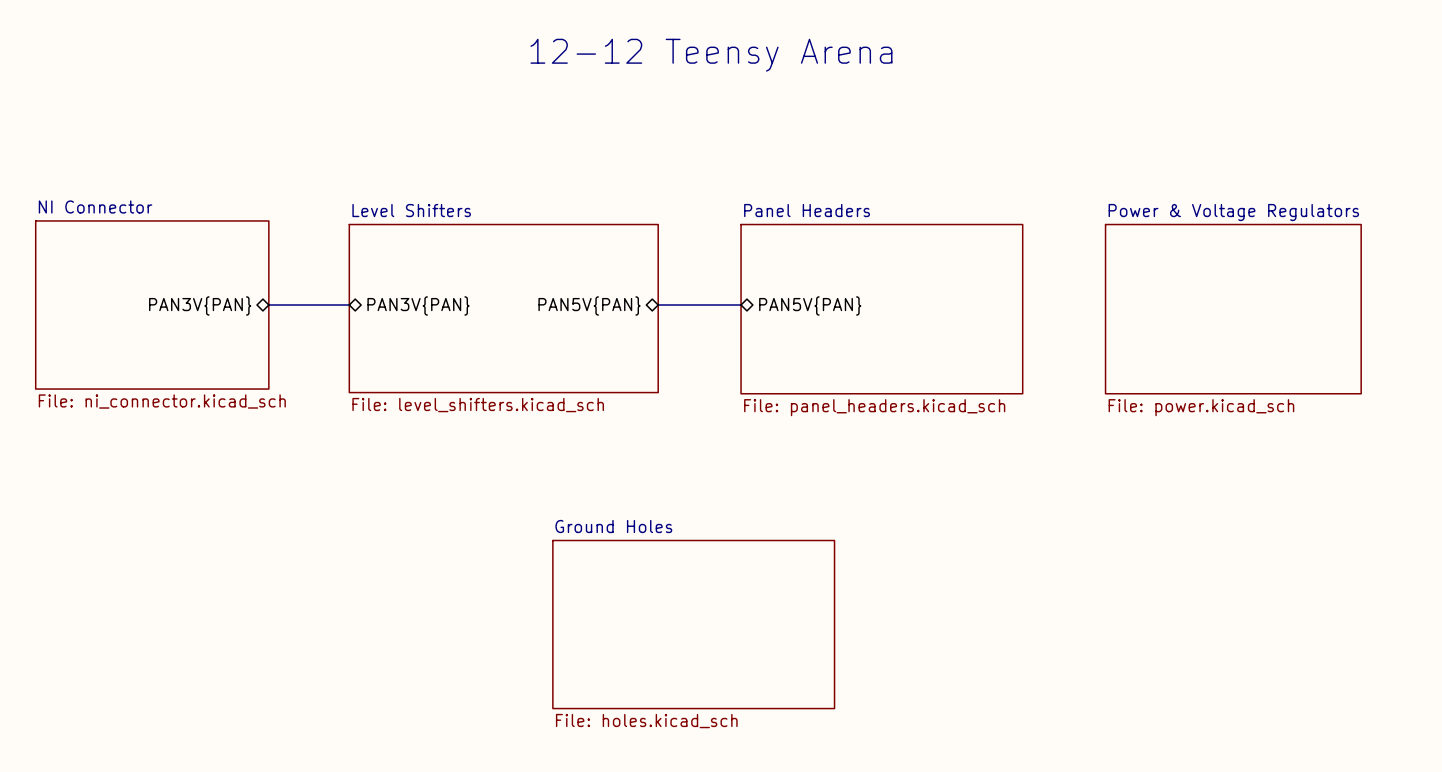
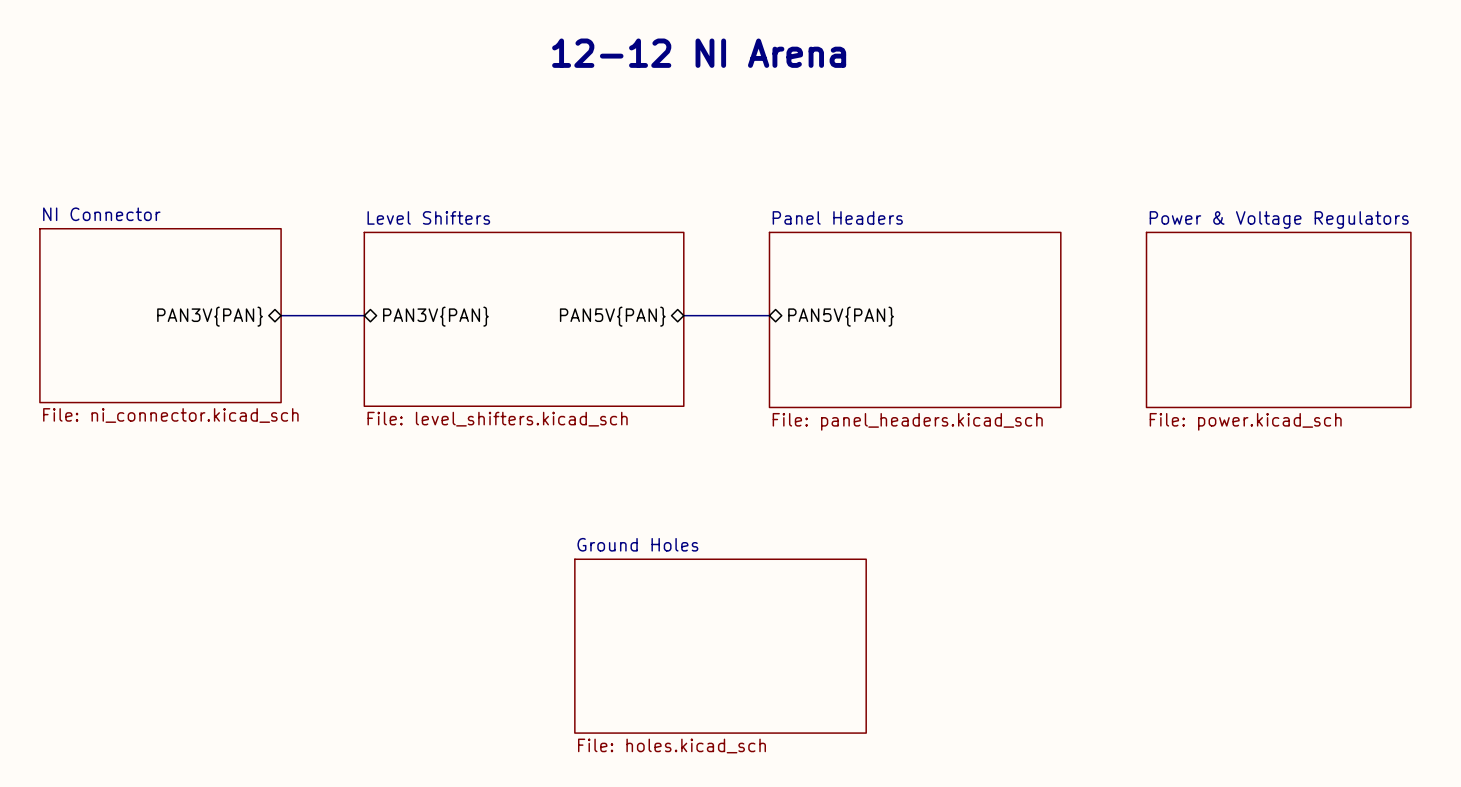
text: 12-12 Teensy Arena (711, 55) -> 12-12 NI Arena (699, 53)

